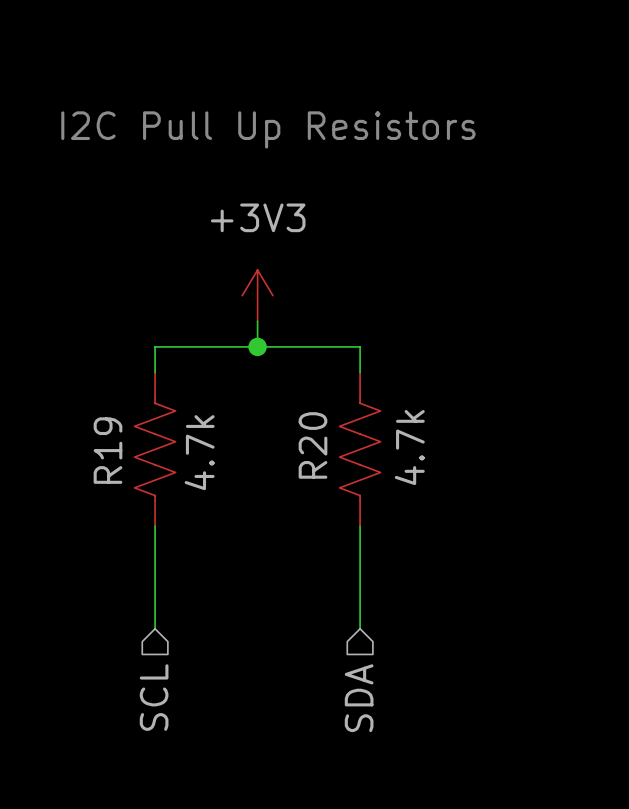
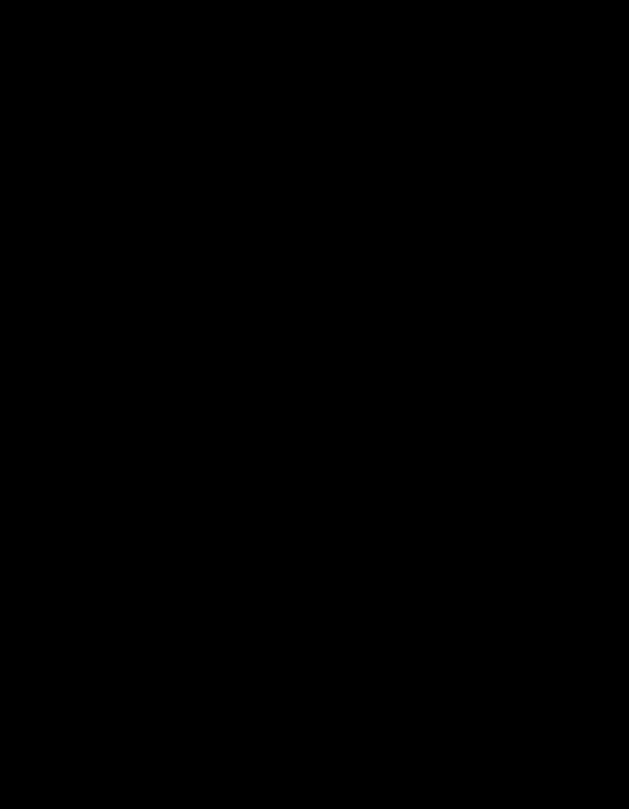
text: I2C Pull Up Resistors (268, 129) -> none
power symbol: +3V3 (257, 295) -> none
wire: (257, 321) (257, 346) -> none
junction: (257, 346) -> none
wire: (155, 372) (155, 346) (360, 346) (360, 372) -> none
R19: 4.7k (155, 449) -> none
R20: 4.7k (360, 449) -> none
wire: (155, 526) (155, 628) -> none
wire: (360, 526) (360, 628) -> none
hierarchical label: SCL (154, 697) -> none
hierarchical label: SDA (359, 698) -> none

